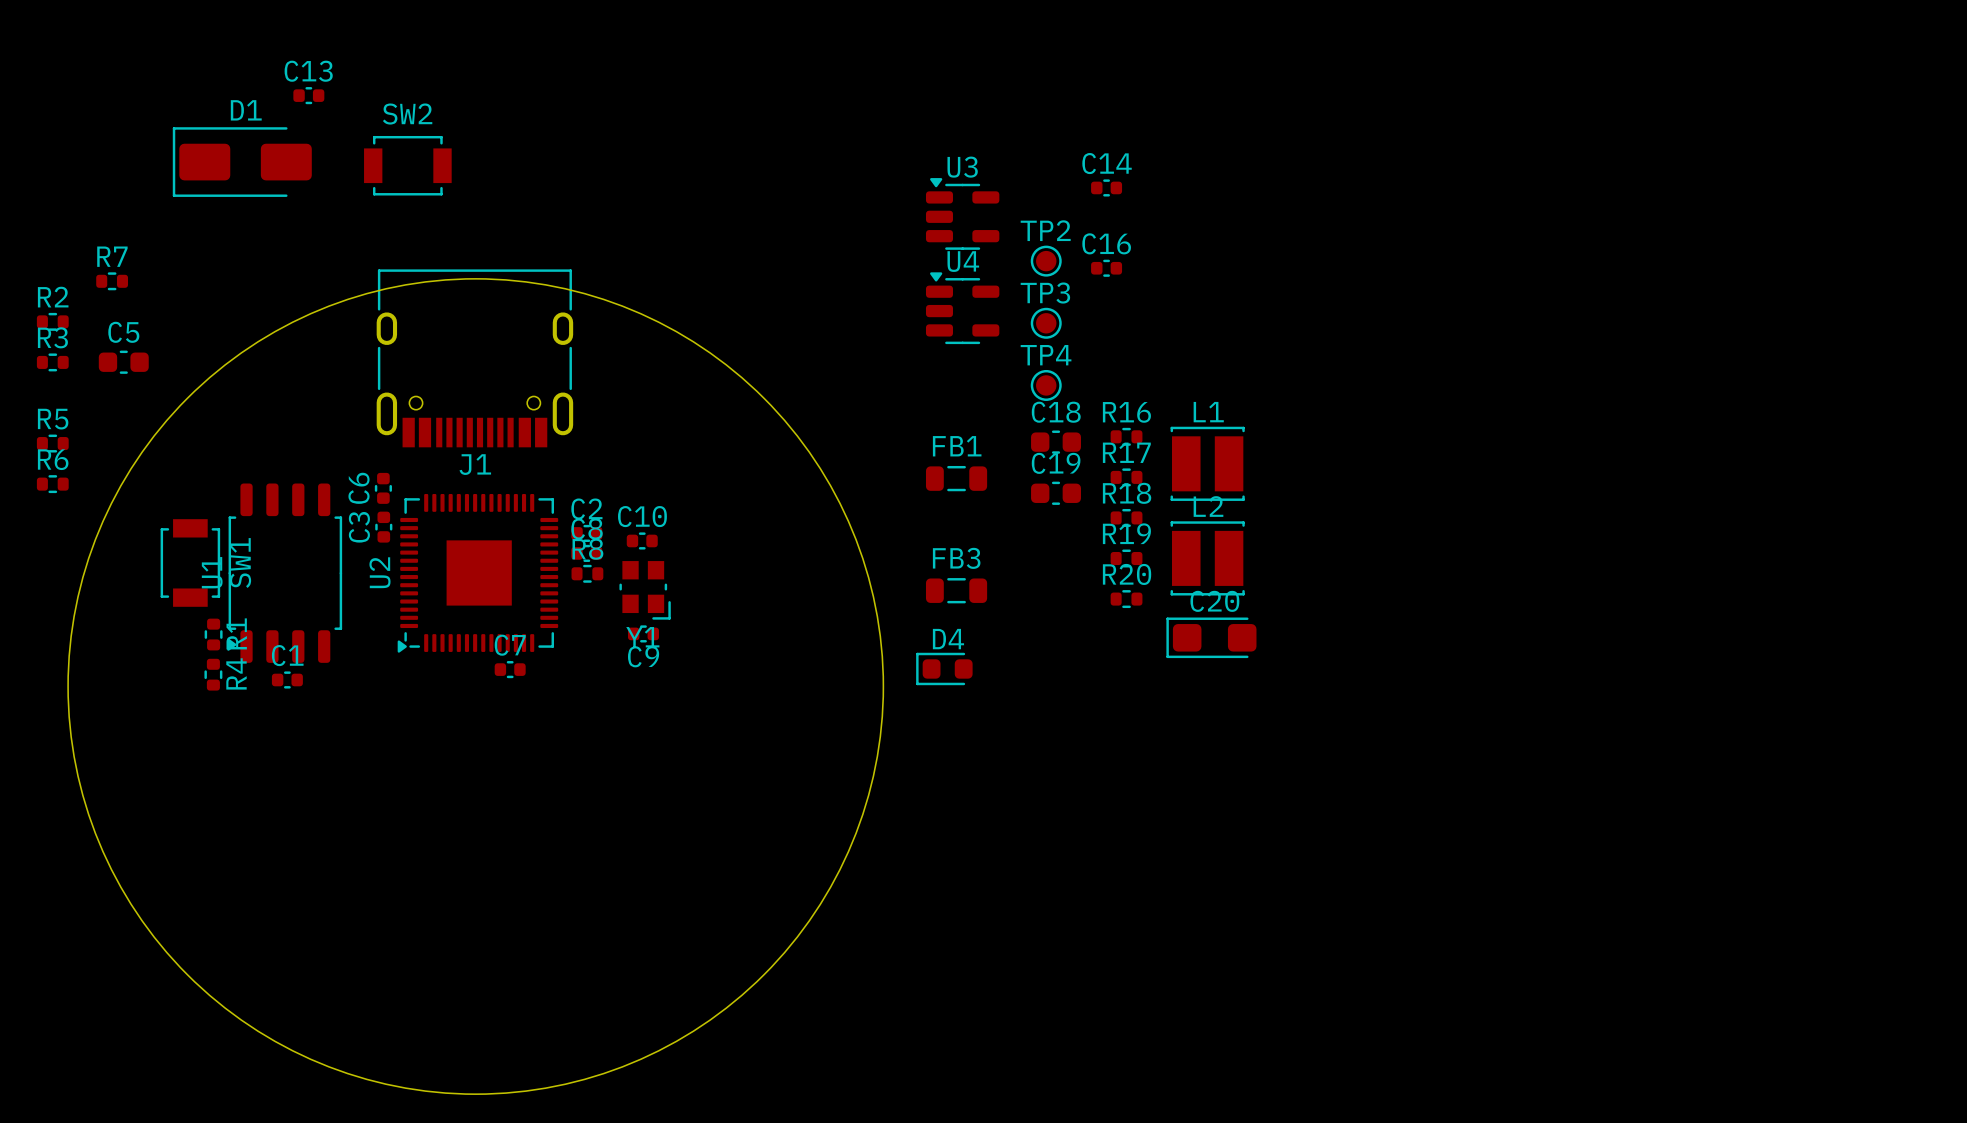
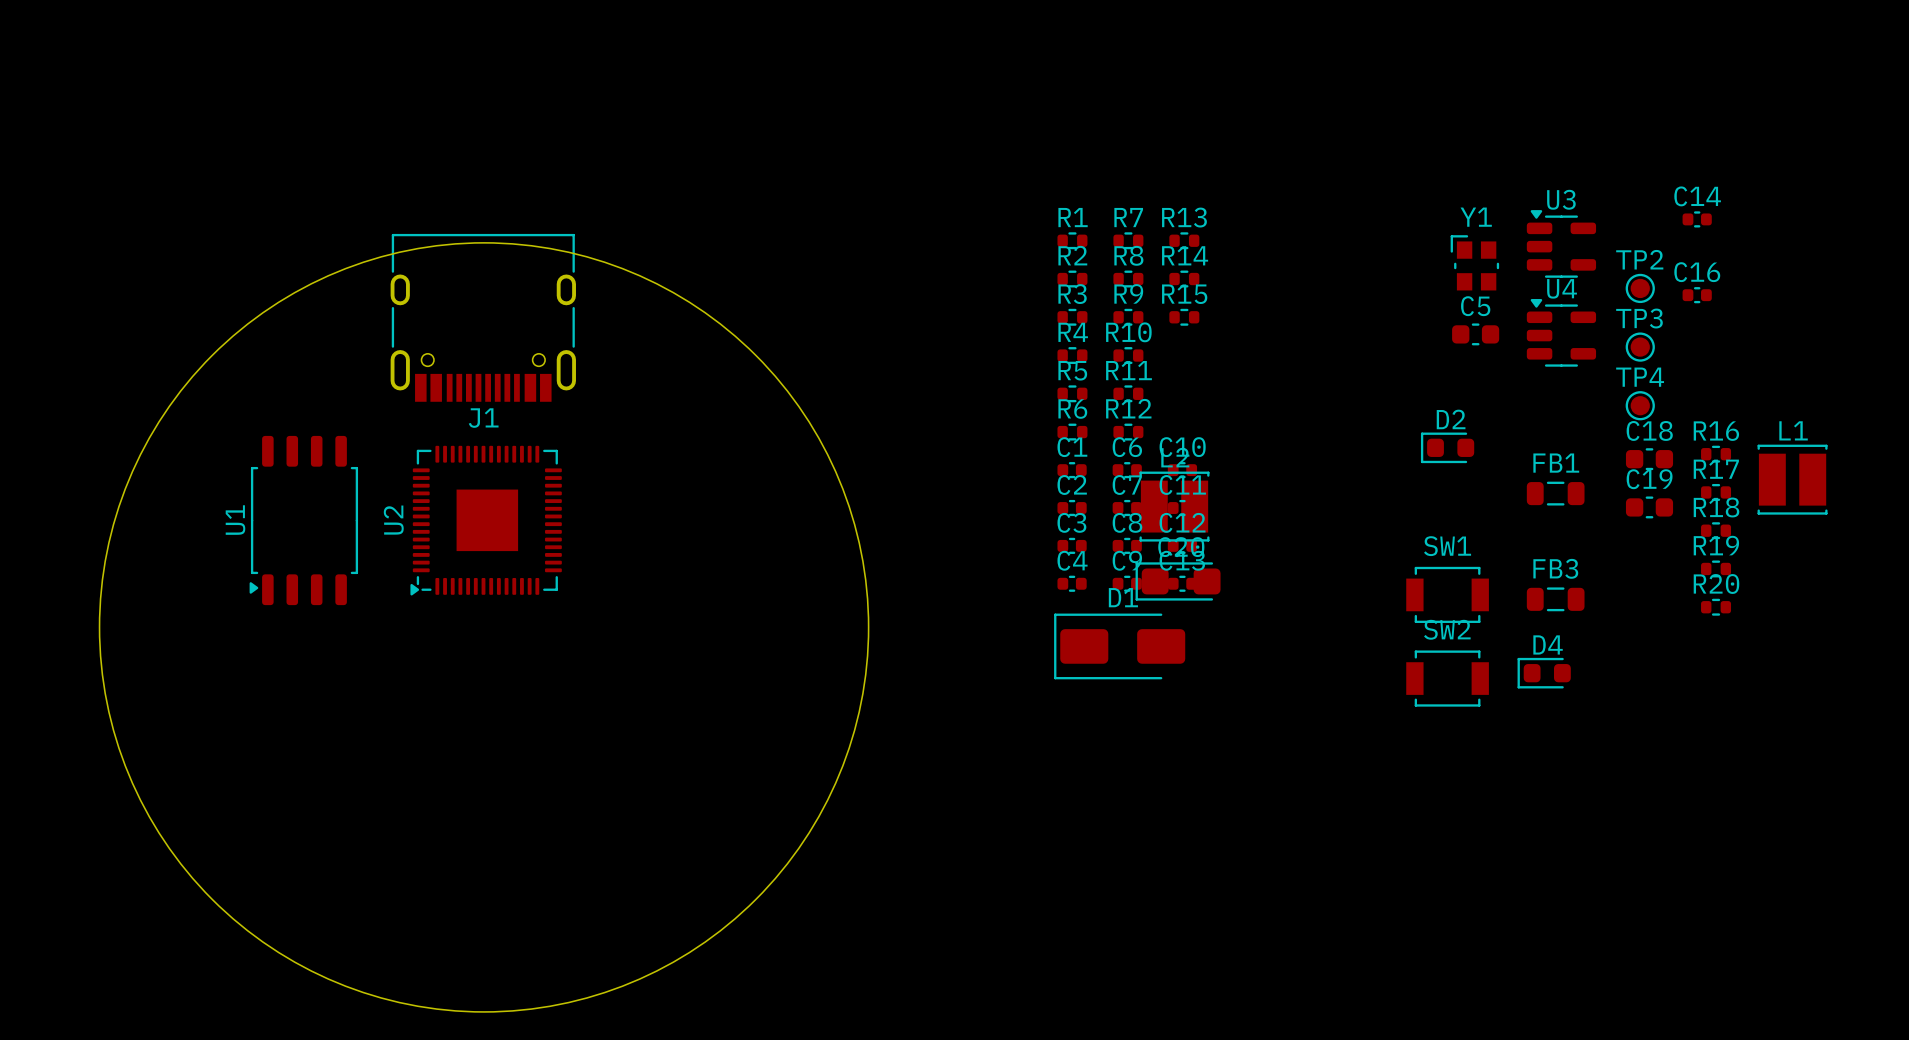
C13 position: (308, 95) -> (1182, 583)
D1 position: (242, 162) -> (1119, 646)
SW2 position: (407, 165) -> (1447, 678)
C14 position: (1106, 187) -> (1697, 219)
U3 position: (962, 213) -> (1561, 243)
TP2 position: (1046, 261) -> (1640, 288)
C16 position: (1106, 268) -> (1697, 295)
R13: none -> (1184, 240)
R7 position: (112, 281) -> (1128, 240)
U4 position: (962, 308) -> (1561, 332)
R14: none -> (1184, 279)
R2 position: (52, 321) -> (1072, 279)
TP3 position: (1046, 323) -> (1640, 347)
R9: none -> (1128, 317)
R15: none -> (1184, 317)
R3 position: (52, 362) -> (1072, 317)
C5 position: (123, 362) -> (1475, 334)
TP4 position: (1046, 385) -> (1640, 405)
R10: none -> (1128, 355)
R16 position: (1126, 436) -> (1716, 454)
R11: none -> (1128, 393)
C18 position: (1056, 442) -> (1649, 459)
R5 position: (52, 443) -> (1072, 393)
L1 position: (1207, 463) -> (1792, 479)
R17 position: (1126, 477) -> (1716, 492)
FB1 position: (956, 478) -> (1555, 493)
R12: none -> (1128, 432)
R6 position: (52, 484) -> (1072, 432)
C6 rotation: 0° (383, 488) -> 90° clockwise (1127, 470)
C6 position: (383, 488) -> (1127, 470)
C19 position: (1056, 493) -> (1649, 507)
D2: none -> (1447, 447)
R18 position: (1126, 517) -> (1716, 530)
C3 rotation: 0° (383, 527) -> 90° clockwise (1072, 545)
C3 position: (383, 527) -> (1072, 545)
C2 position: (586, 533) -> (1072, 508)
C10 position: (642, 540) -> (1182, 470)
C8 position: (586, 553) -> (1127, 545)
R19 position: (1126, 558) -> (1716, 568)
C11: none -> (1182, 508)
SW1 rotation: 0° (190, 562) -> 90° clockwise (1447, 594)
SW1 position: (190, 562) -> (1447, 594)
SW1 name position: SW1 (240, 563) -> SW1 (1447, 546)
R8 position: (587, 573) -> (1128, 279)
Y1 rotation: 0° (645, 590) -> 180° (1474, 262)
Y1 position: (645, 590) -> (1474, 262)
FB3 position: (956, 590) -> (1555, 599)
R20 position: (1126, 599) -> (1716, 607)
C12: none -> (1182, 545)
C9 position: (643, 633) -> (1127, 583)
R1 rotation: 0° (213, 634) -> 90° clockwise (1072, 240)
R1 position: (213, 634) -> (1072, 240)
C4: none -> (1072, 583)
C9 name position: C9 (643, 656) -> C9 (1127, 560)
D4 position: (944, 668) -> (1544, 673)
C7 position: (510, 669) -> (1127, 508)
R4 rotation: 0° (213, 674) -> 90° clockwise (1072, 355)
R4 position: (213, 674) -> (1072, 355)
C1 position: (287, 679) -> (1072, 470)

